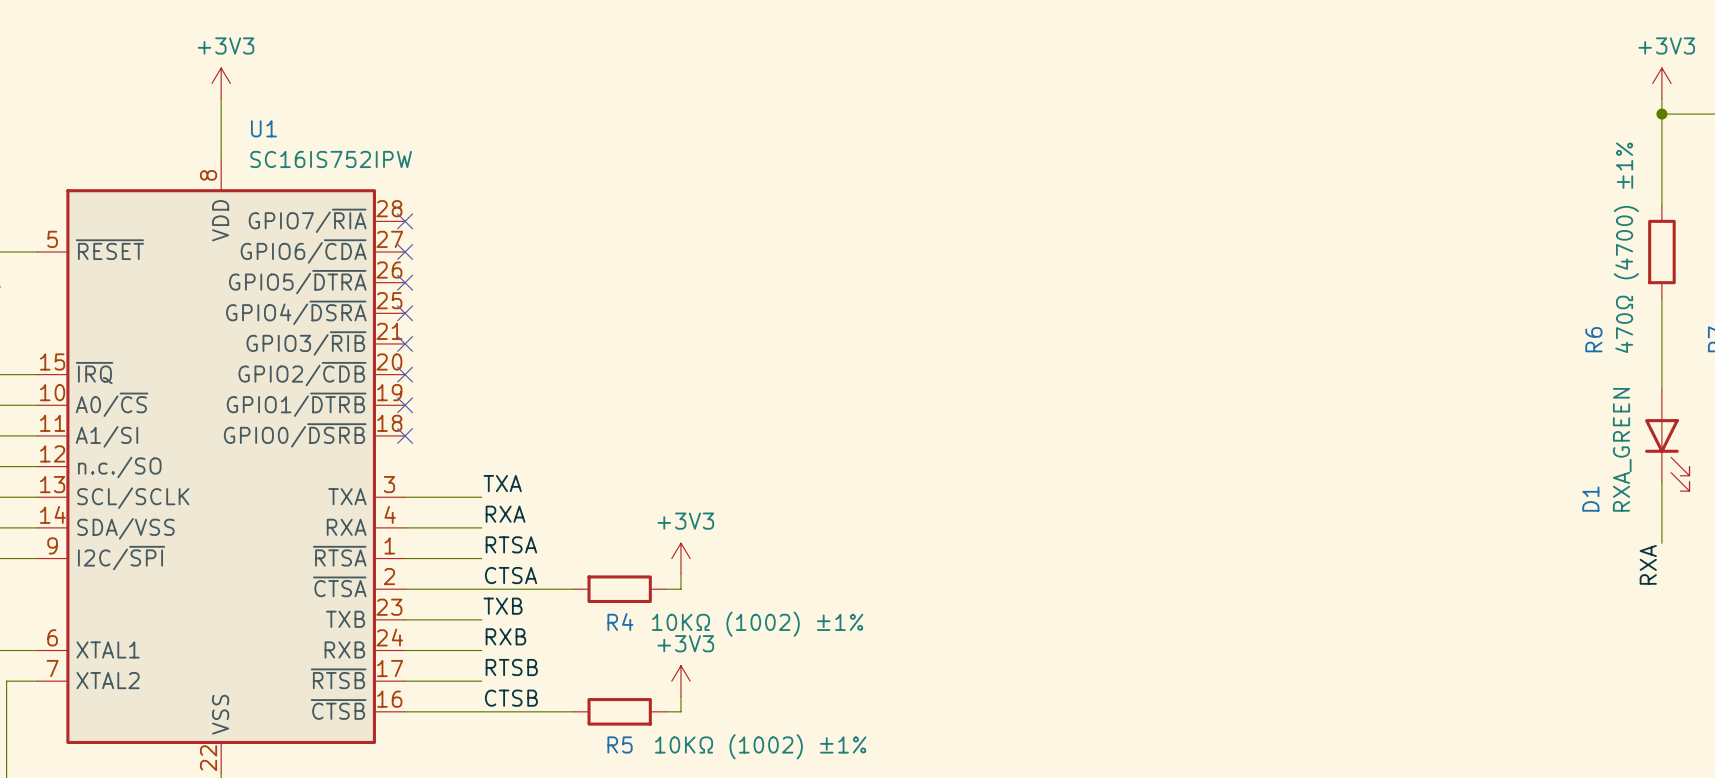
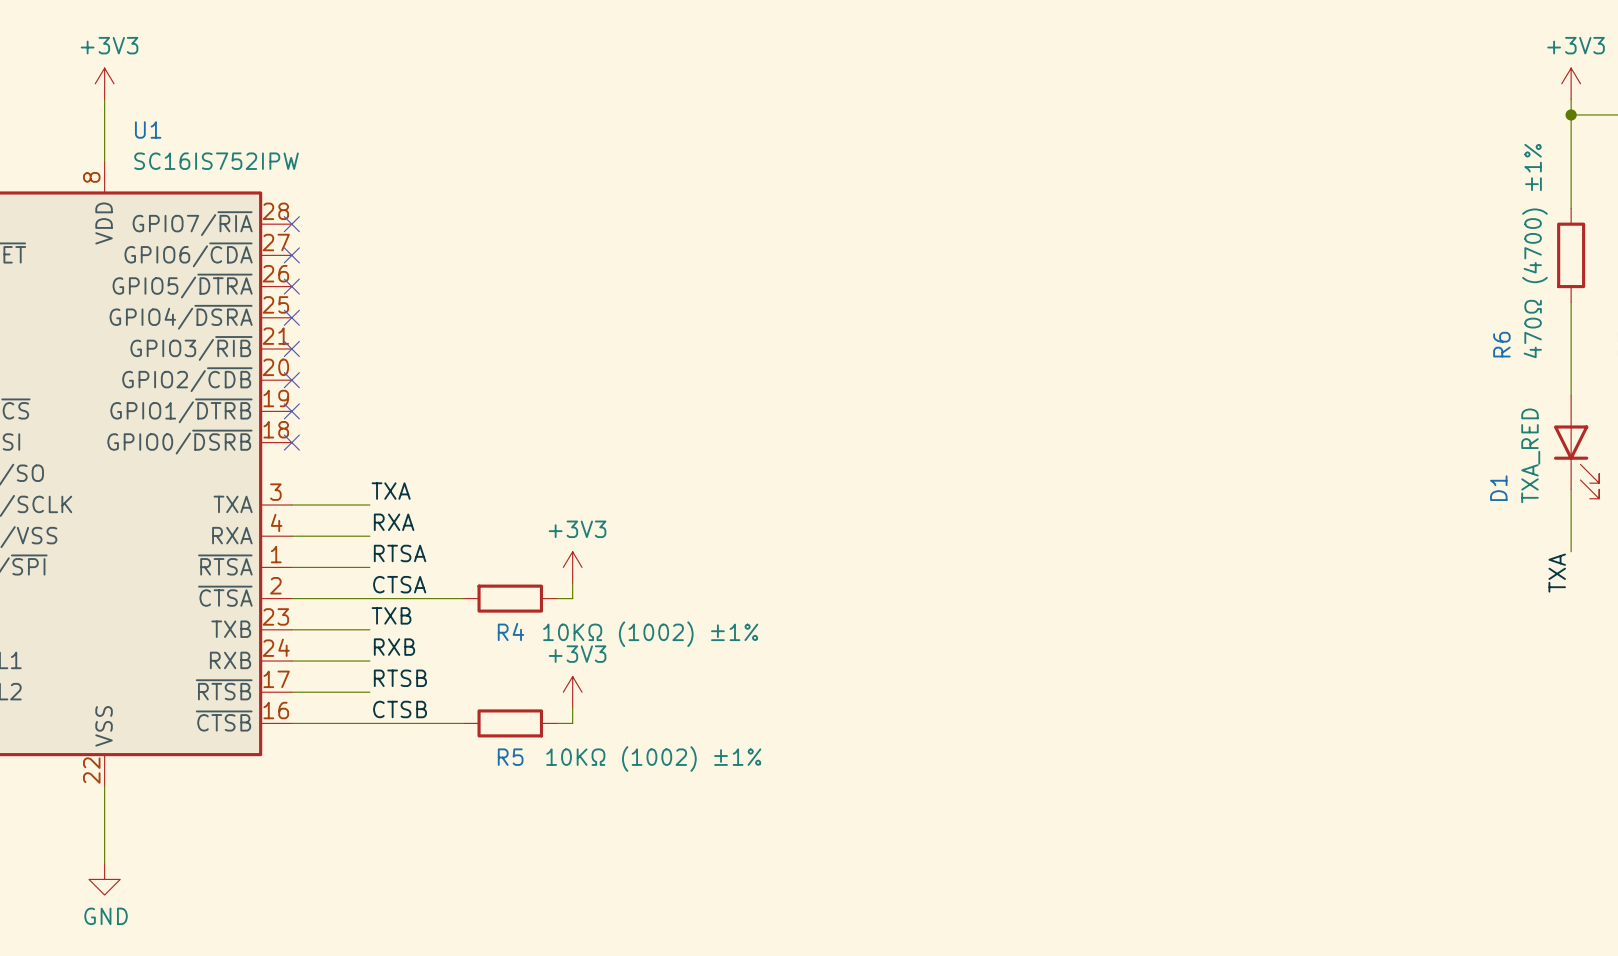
D1 value: RXA_GREEN (1622, 449) -> TXA_RED (1530, 455)
D1 name position: D1 (1590, 499) -> D1 (1498, 488)
label: RXA (1648, 564) -> TXA (1557, 573)

